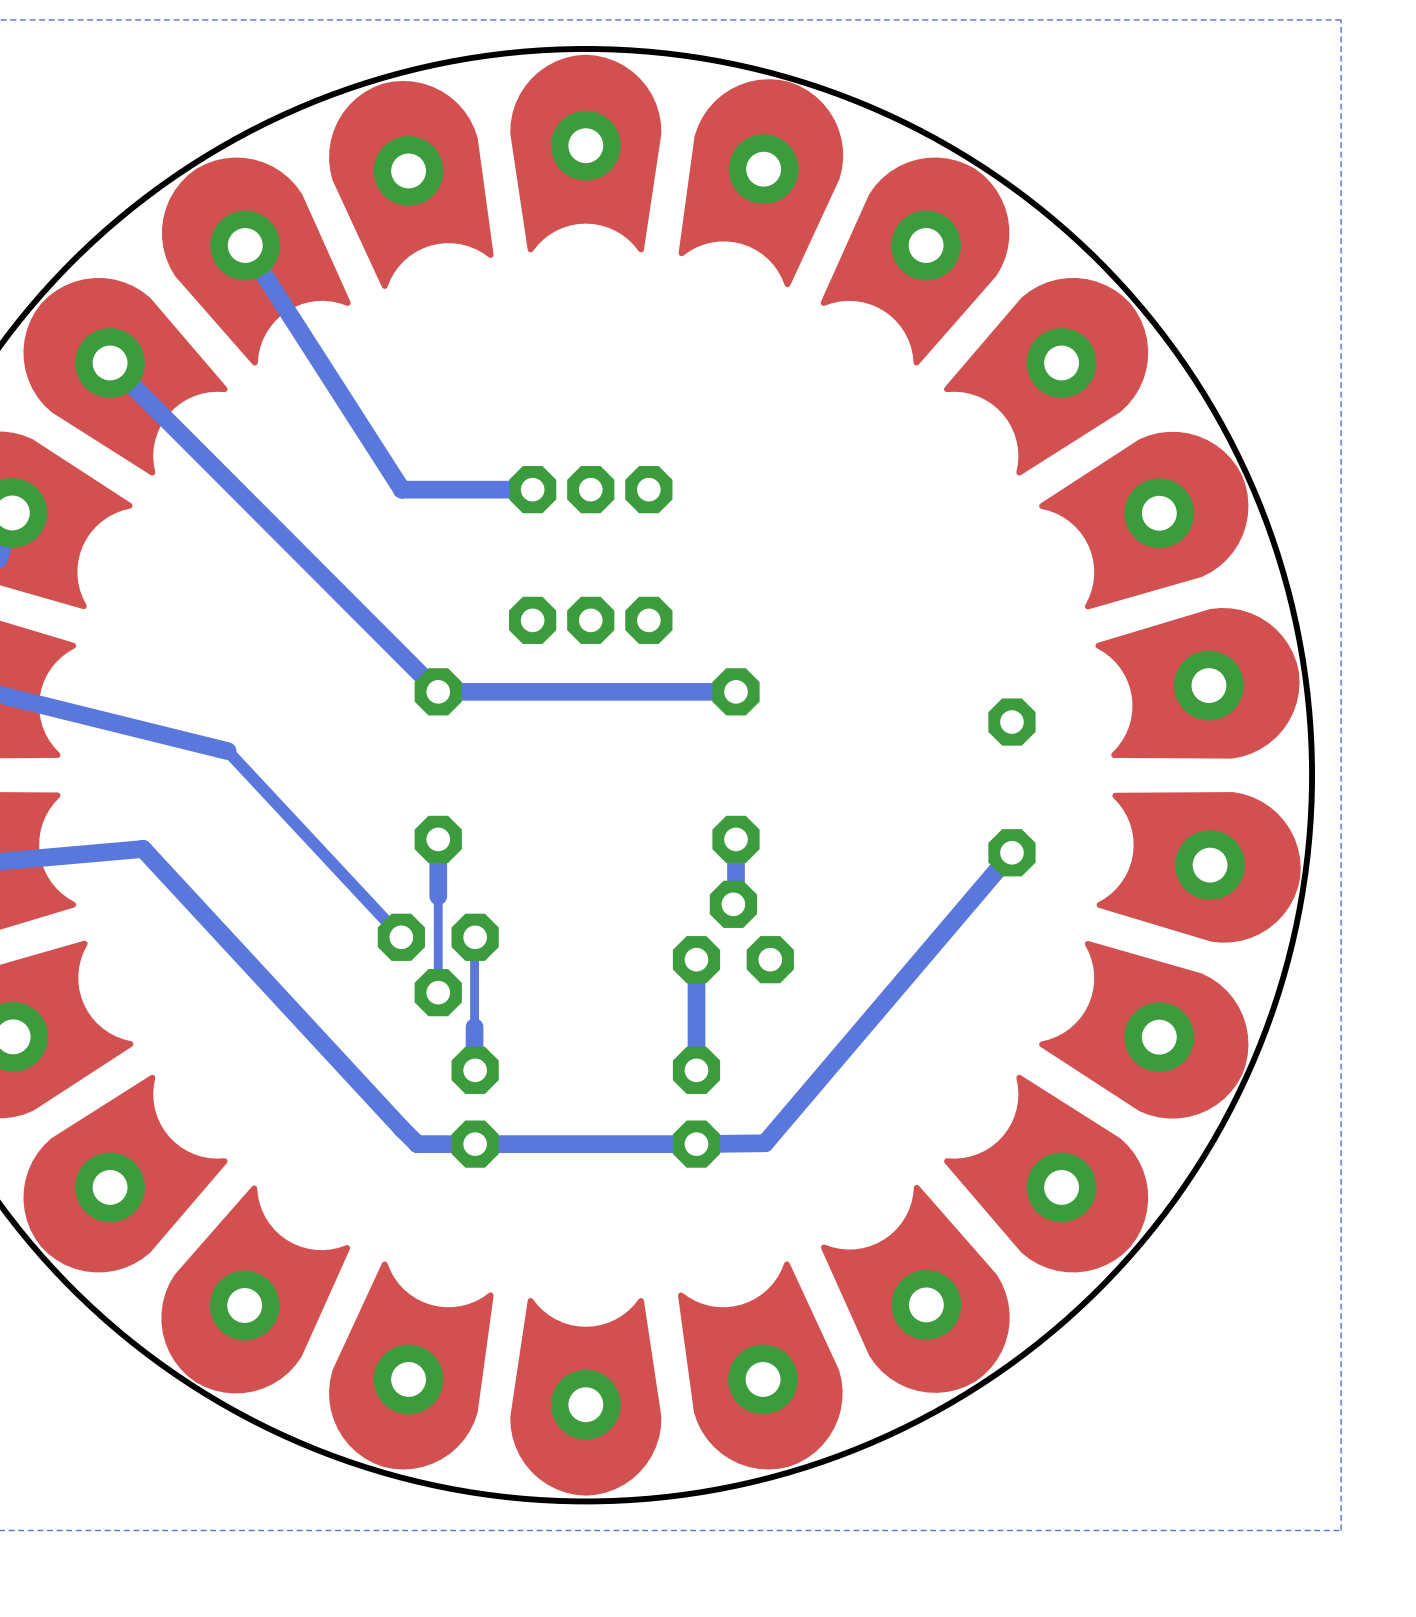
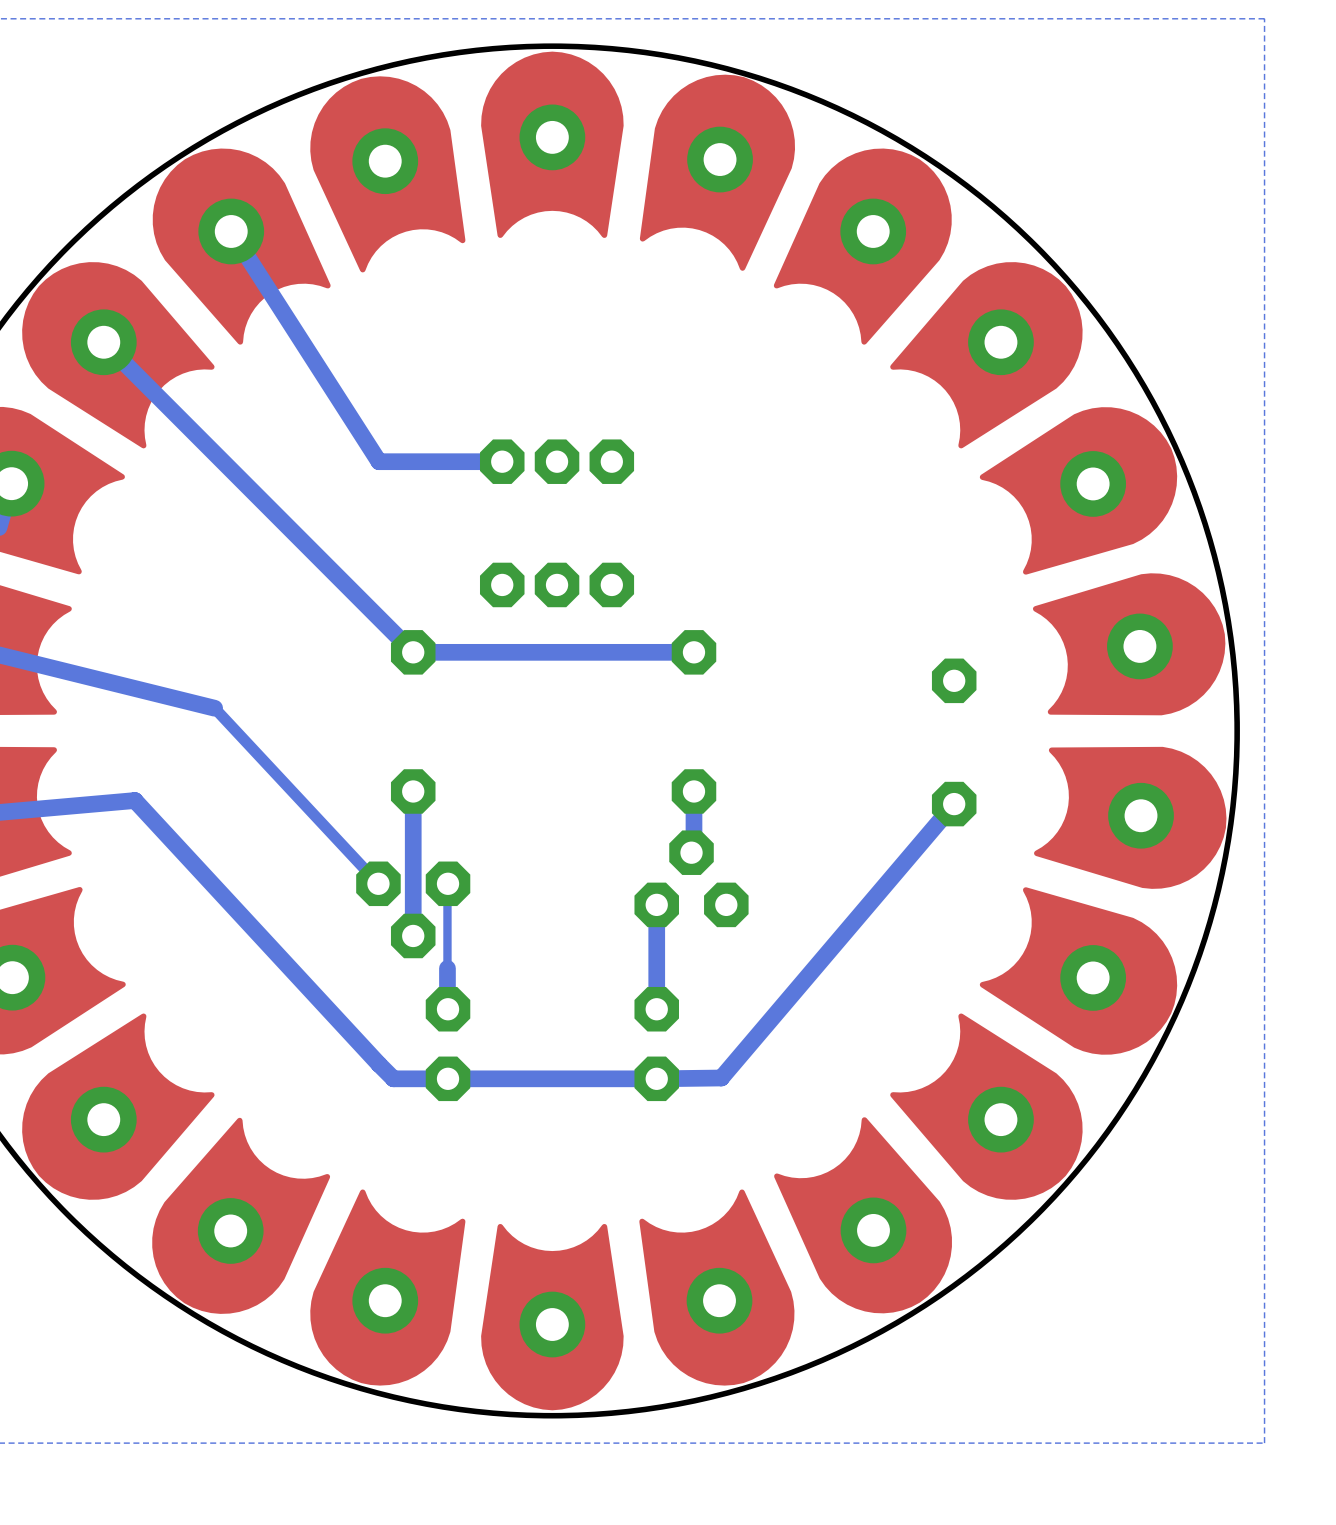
bottom track width: thin (438, 896) (438, 992) -> thick (413, 845) (413, 935)

